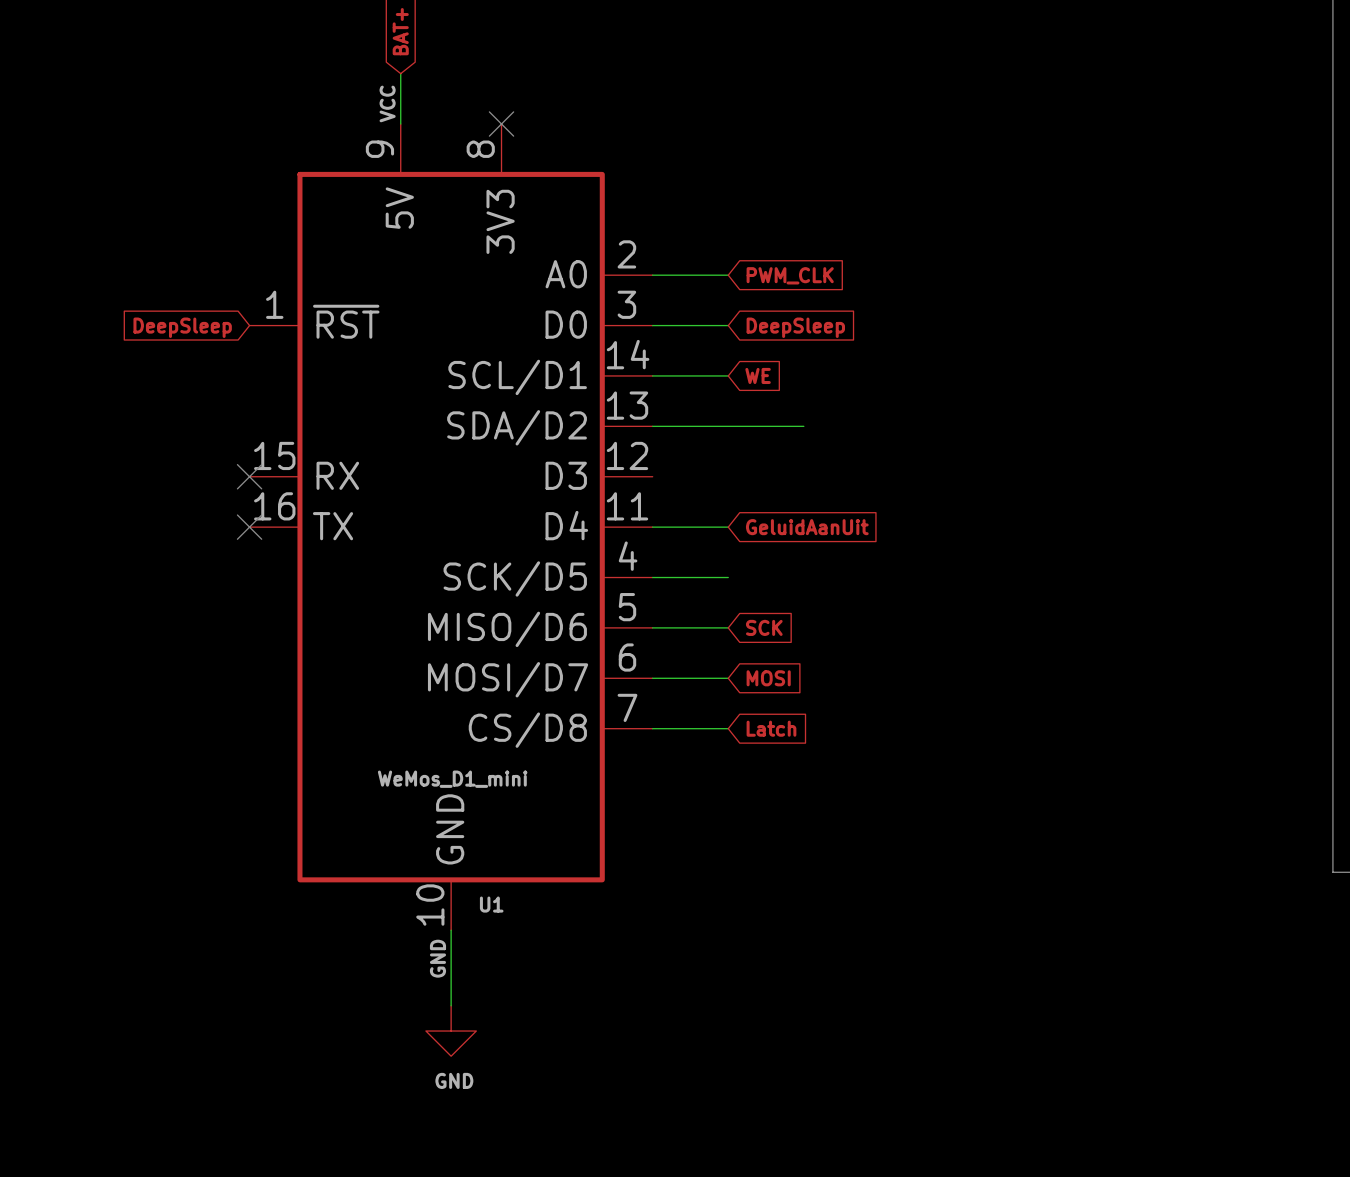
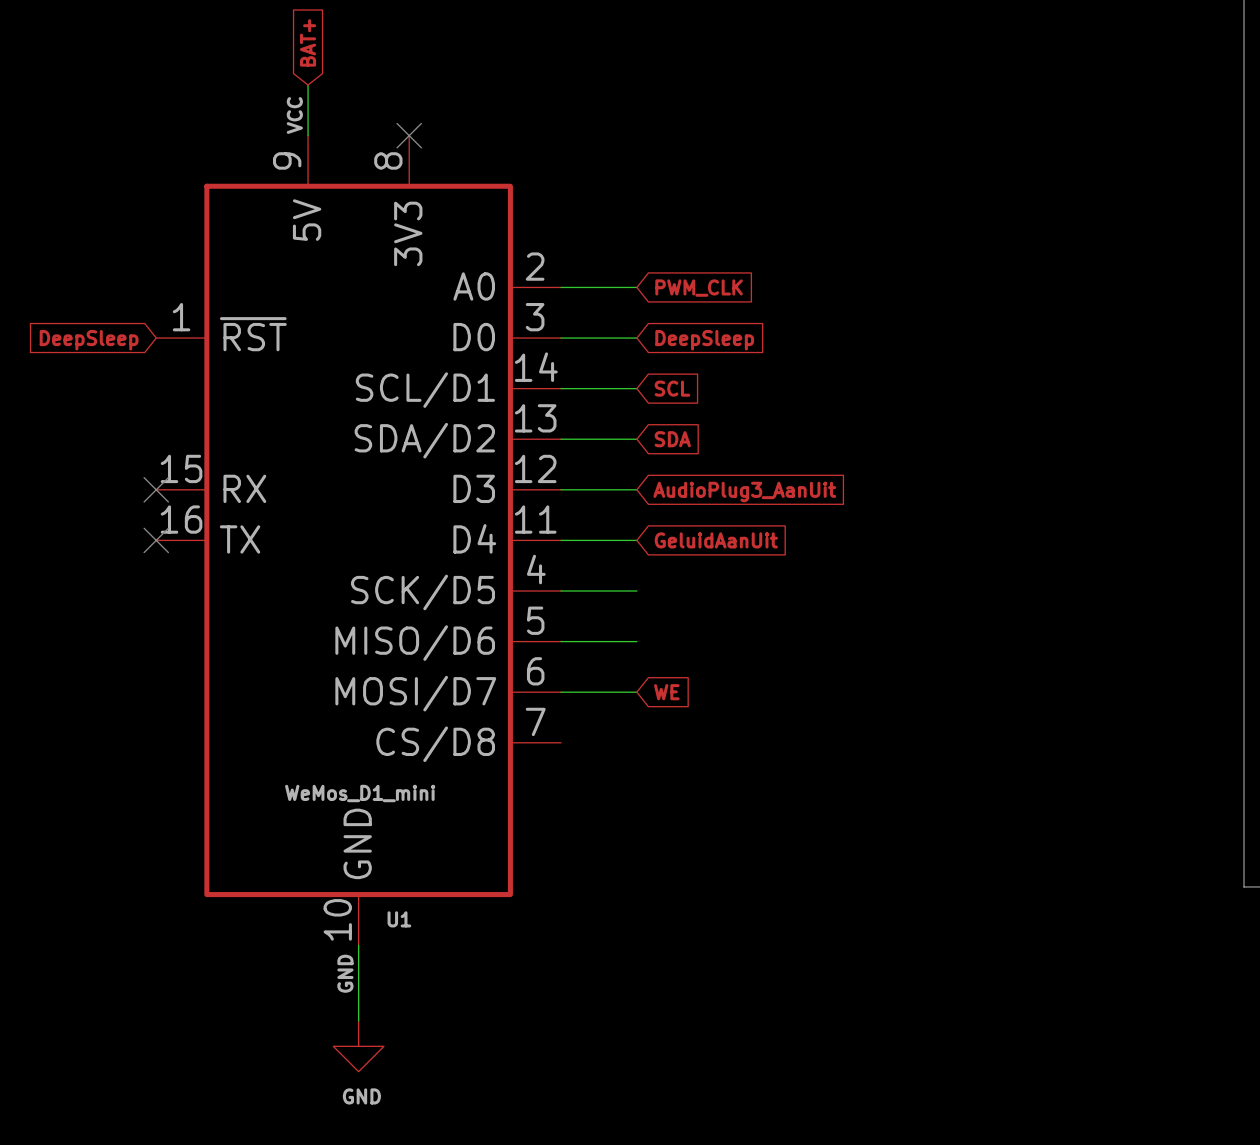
global label: WE (758, 375) -> SCL (672, 388)
wire: (728, 426) (803, 426) -> (561, 489) (636, 489)
global label: none -> SDA (672, 439)
global label: none -> AudioPlug3_AanUit (744, 492)
global label: SCK (764, 627) -> none
global label: MOSI (768, 678) -> WE (666, 692)
wire: (652, 728) (728, 728) -> none
global label: Latch (771, 728) -> none

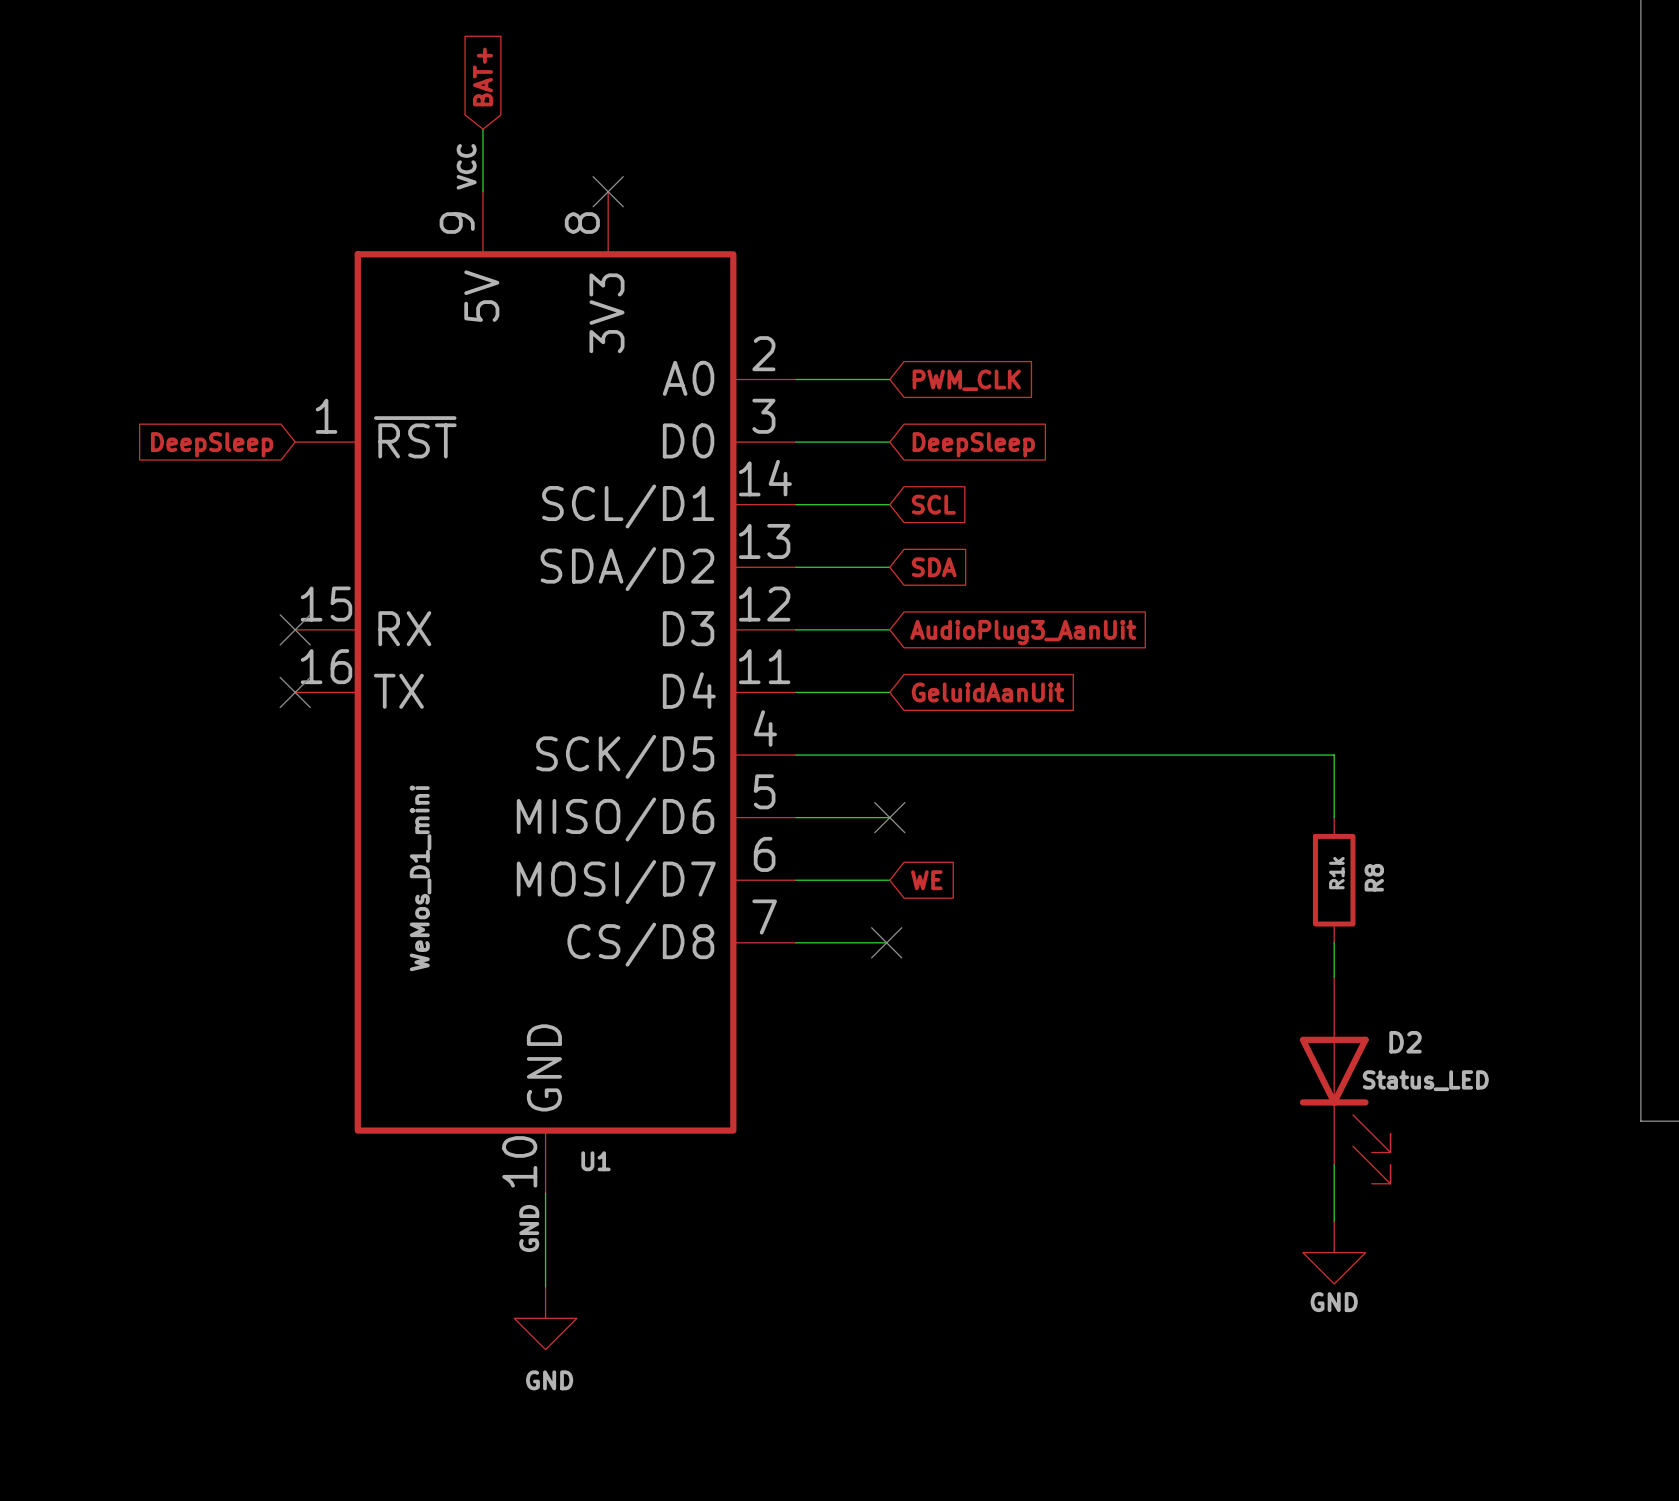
wire: none -> (889, 755) (1334, 755) (1334, 817)
no-connect mark: none -> (889, 817)
R8: none -> R1k (1334, 880)
wire: none -> (795, 942) (886, 942)
no-connect mark: none -> (886, 942)
wire: none -> (1334, 942) (1334, 977)
U1 value rotation: 0° (360, 793) -> 90° counterclockwise (420, 878)
D2: none -> Status_LED (1345, 1080)
wire: none -> (1334, 1165) (1334, 1221)
power symbol: none -> GND (1334, 1252)

